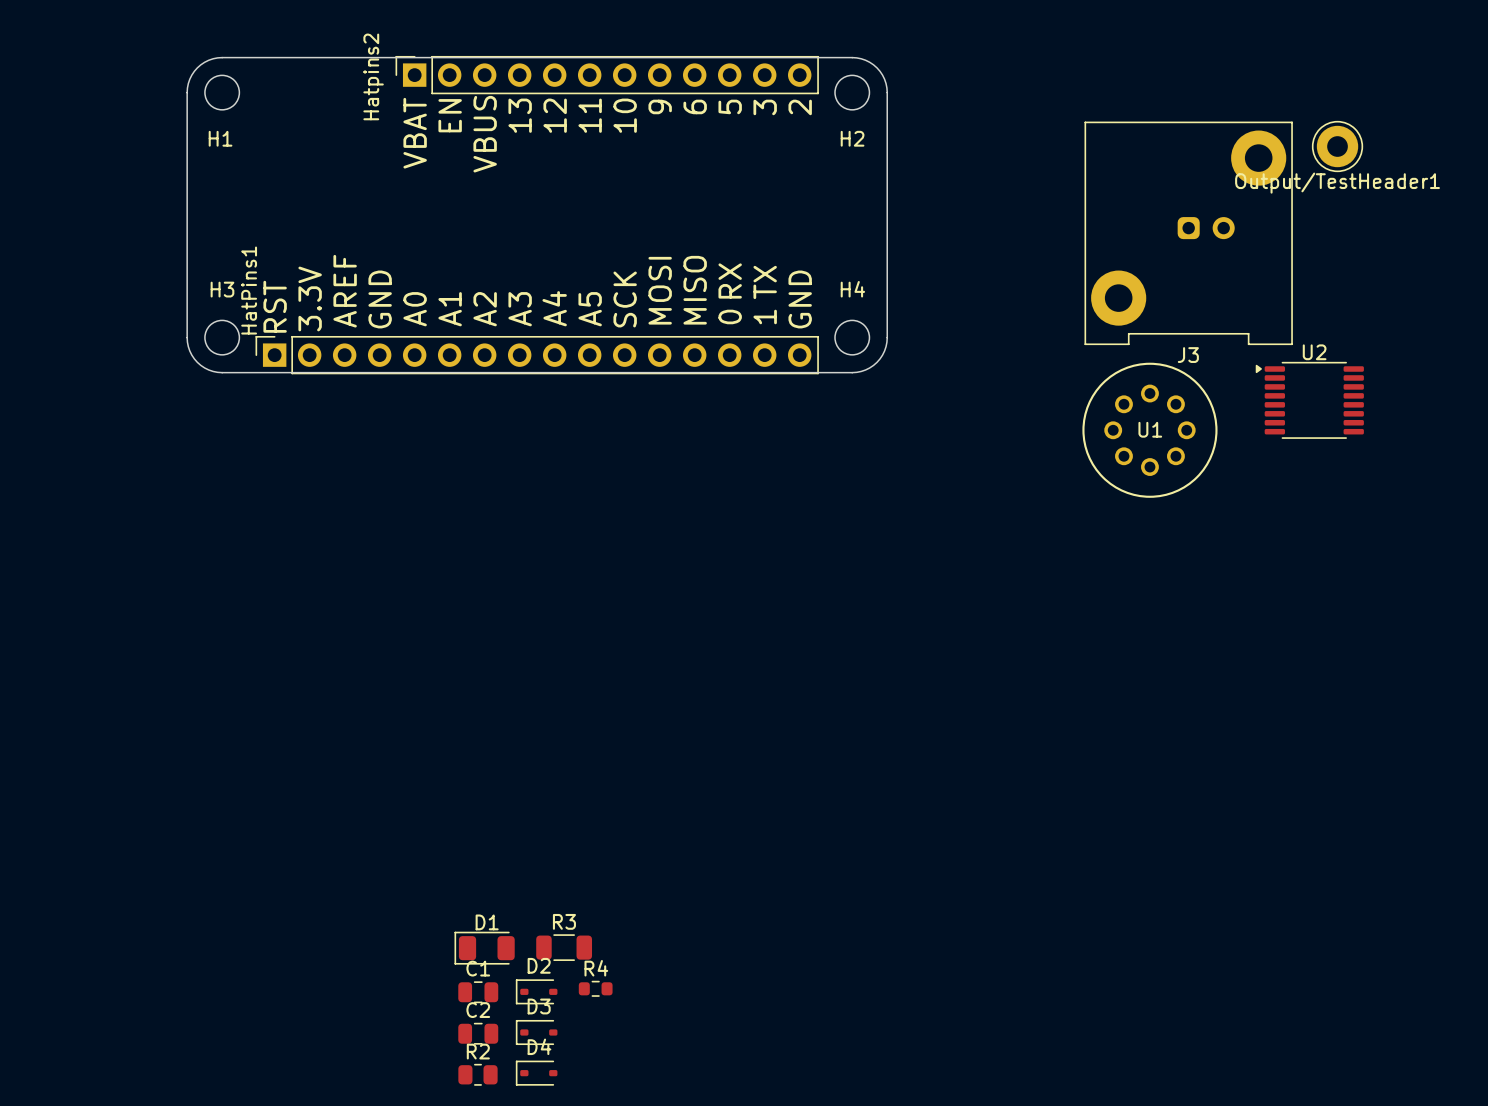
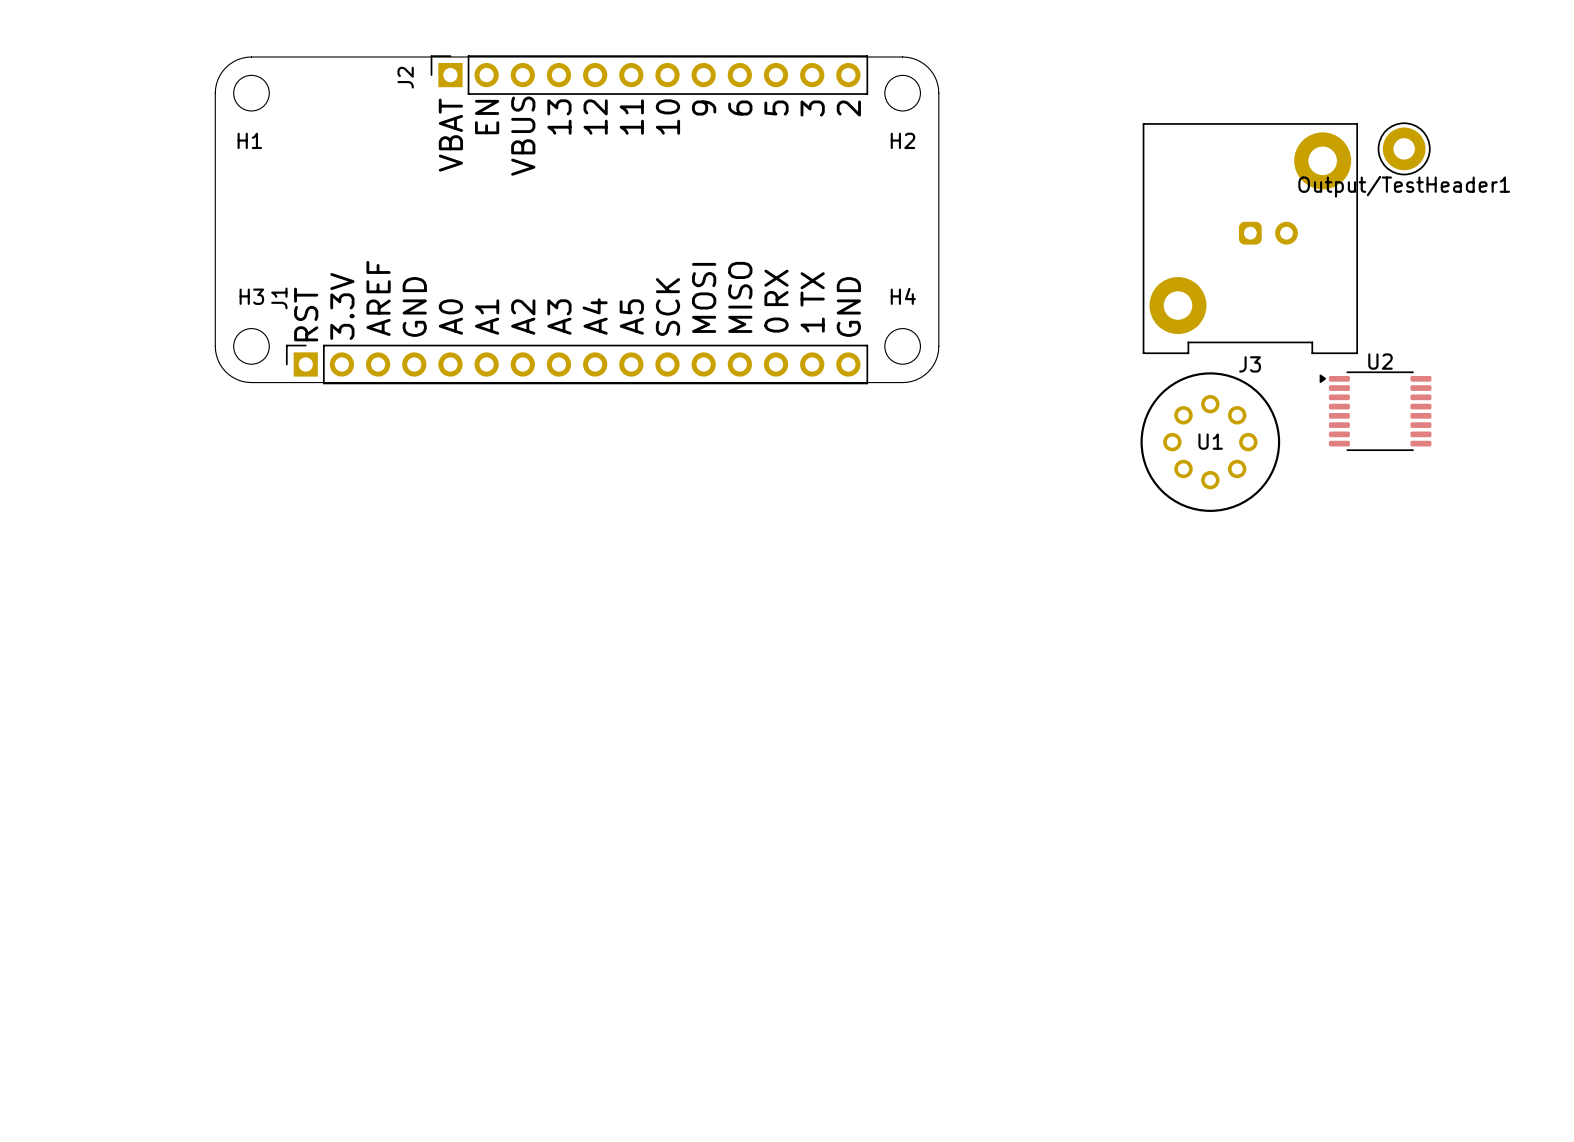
Hatpins2 name: Hatpins2 (373, 76) -> J2 (405, 77)
HatPins1 name: HatPins1 (249, 290) -> J1 (279, 298)
R3: (564, 947) -> none
D1: (484, 948) -> none
R4: (595, 988) -> none
D2: (536, 991) -> none
C1: (478, 992) -> none
D3: (536, 1032) -> none
C2: (478, 1033) -> none
D4: (536, 1073) -> none
R2: (477, 1074) -> none

